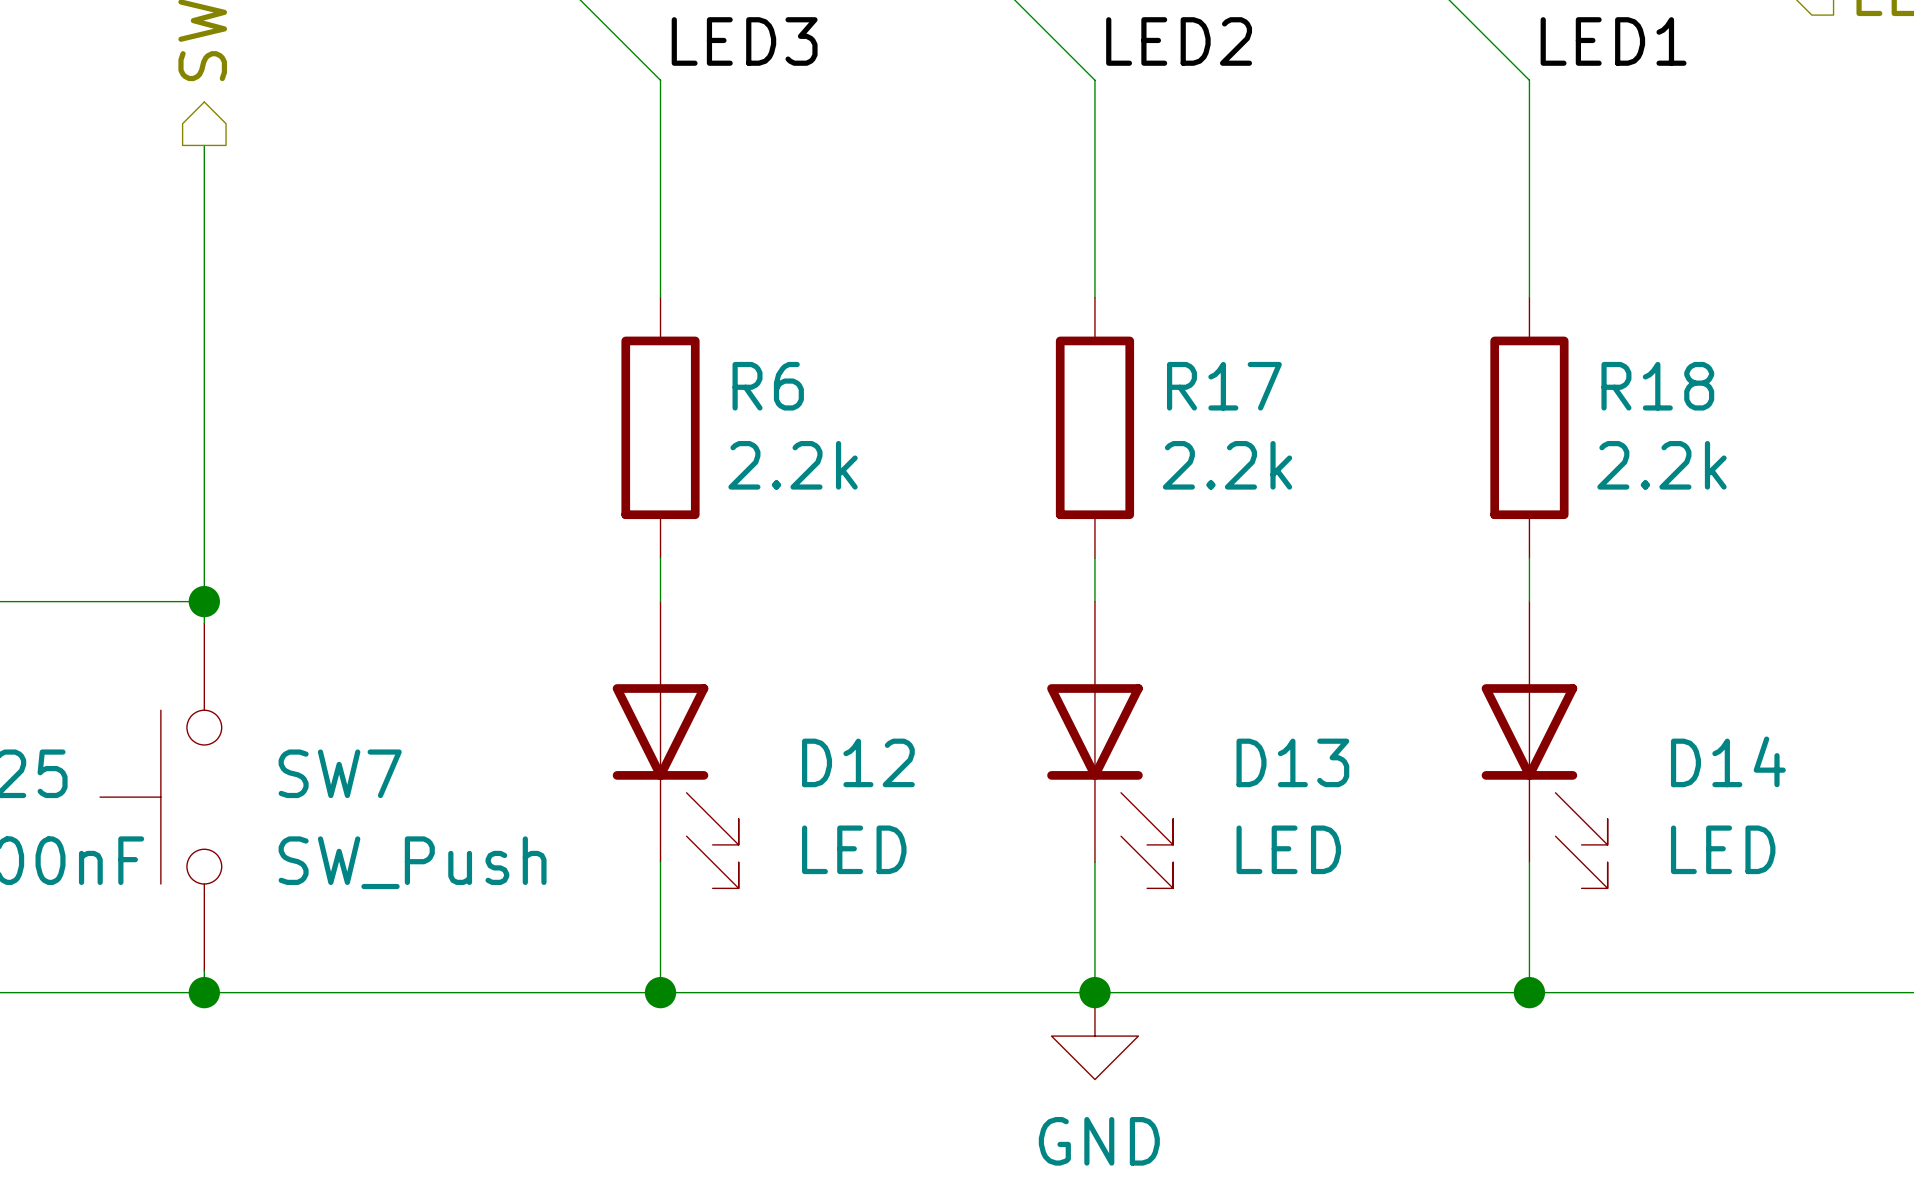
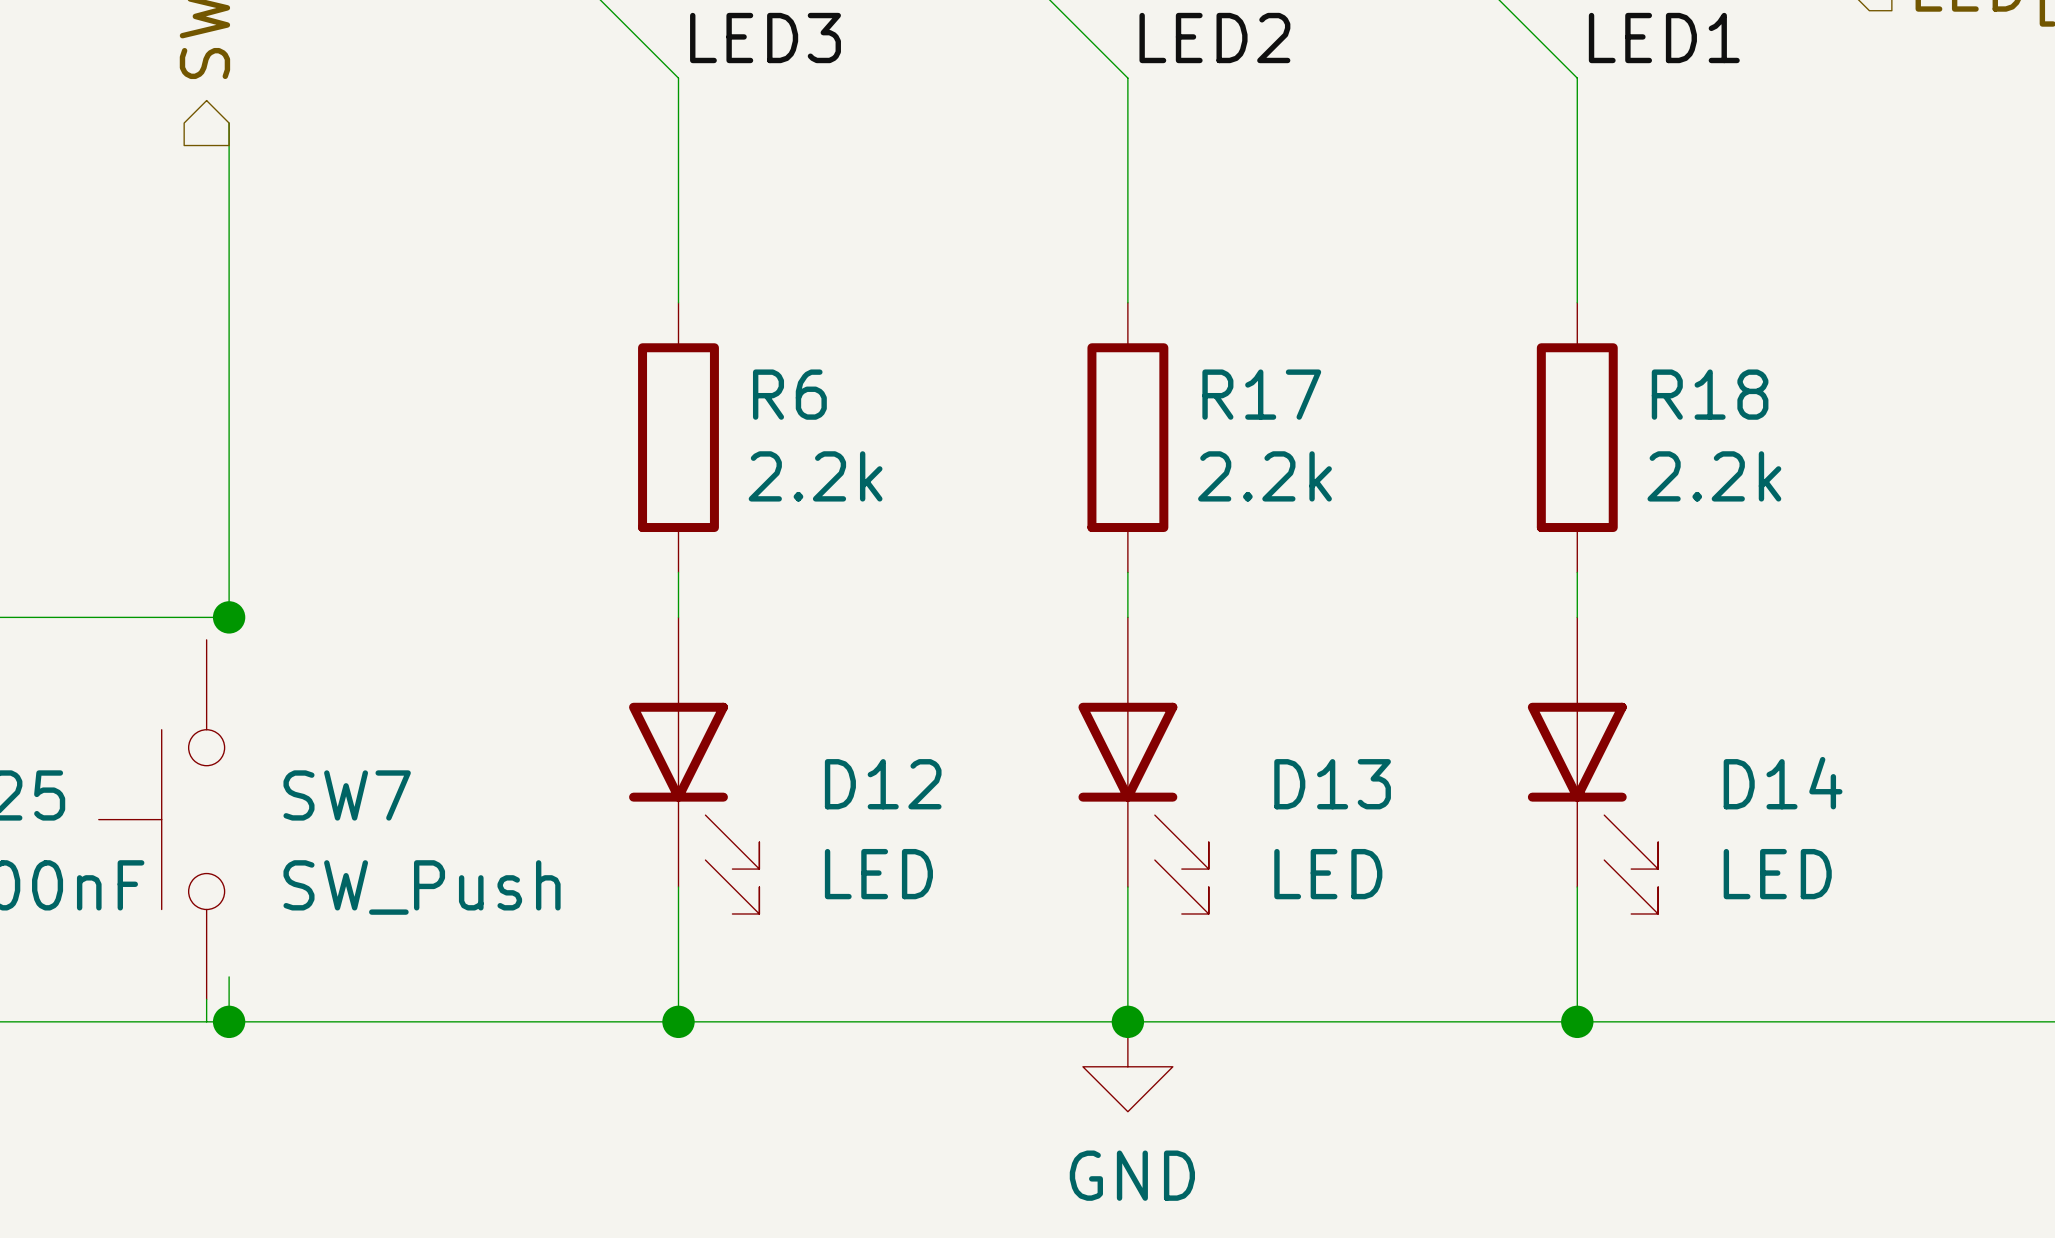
wire: none -> (229, 123) (229, 617) (206, 617)
wire: (204, 145) (204, 623) -> none
junction position: (204, 601) -> (229, 617)
wire: none -> (229, 976) (229, 1021)
junction position: (204, 992) -> (229, 1021)

